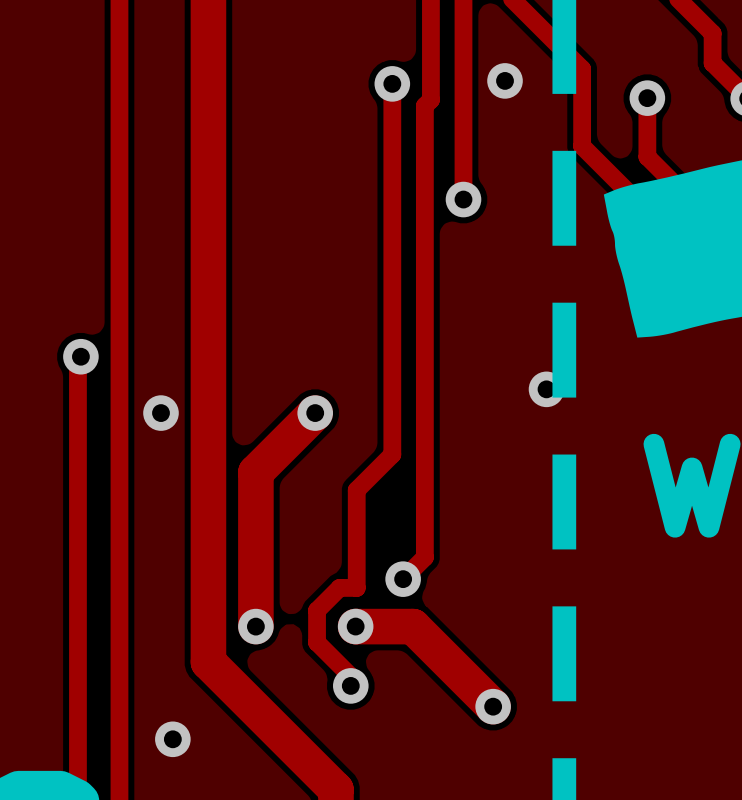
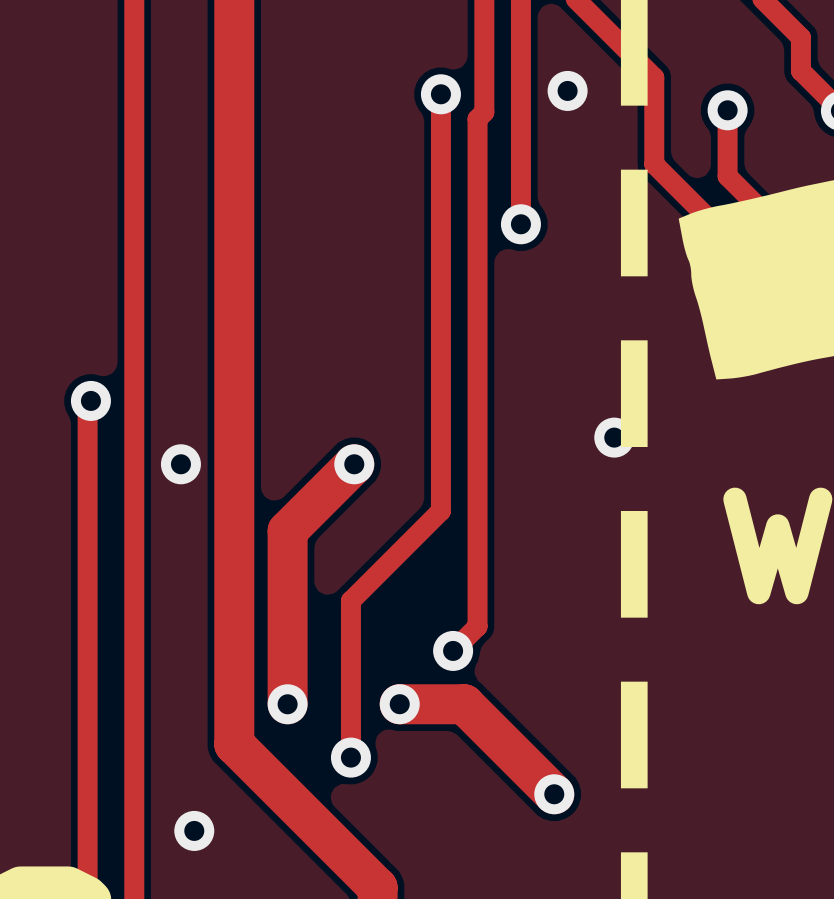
track: (356, 490) (356, 587) (339, 587) (317, 610) (317, 642) (350, 676) (350, 685) -> (400, 550) (350, 600) (350, 757)
via position: (350, 685) -> (350, 757)

